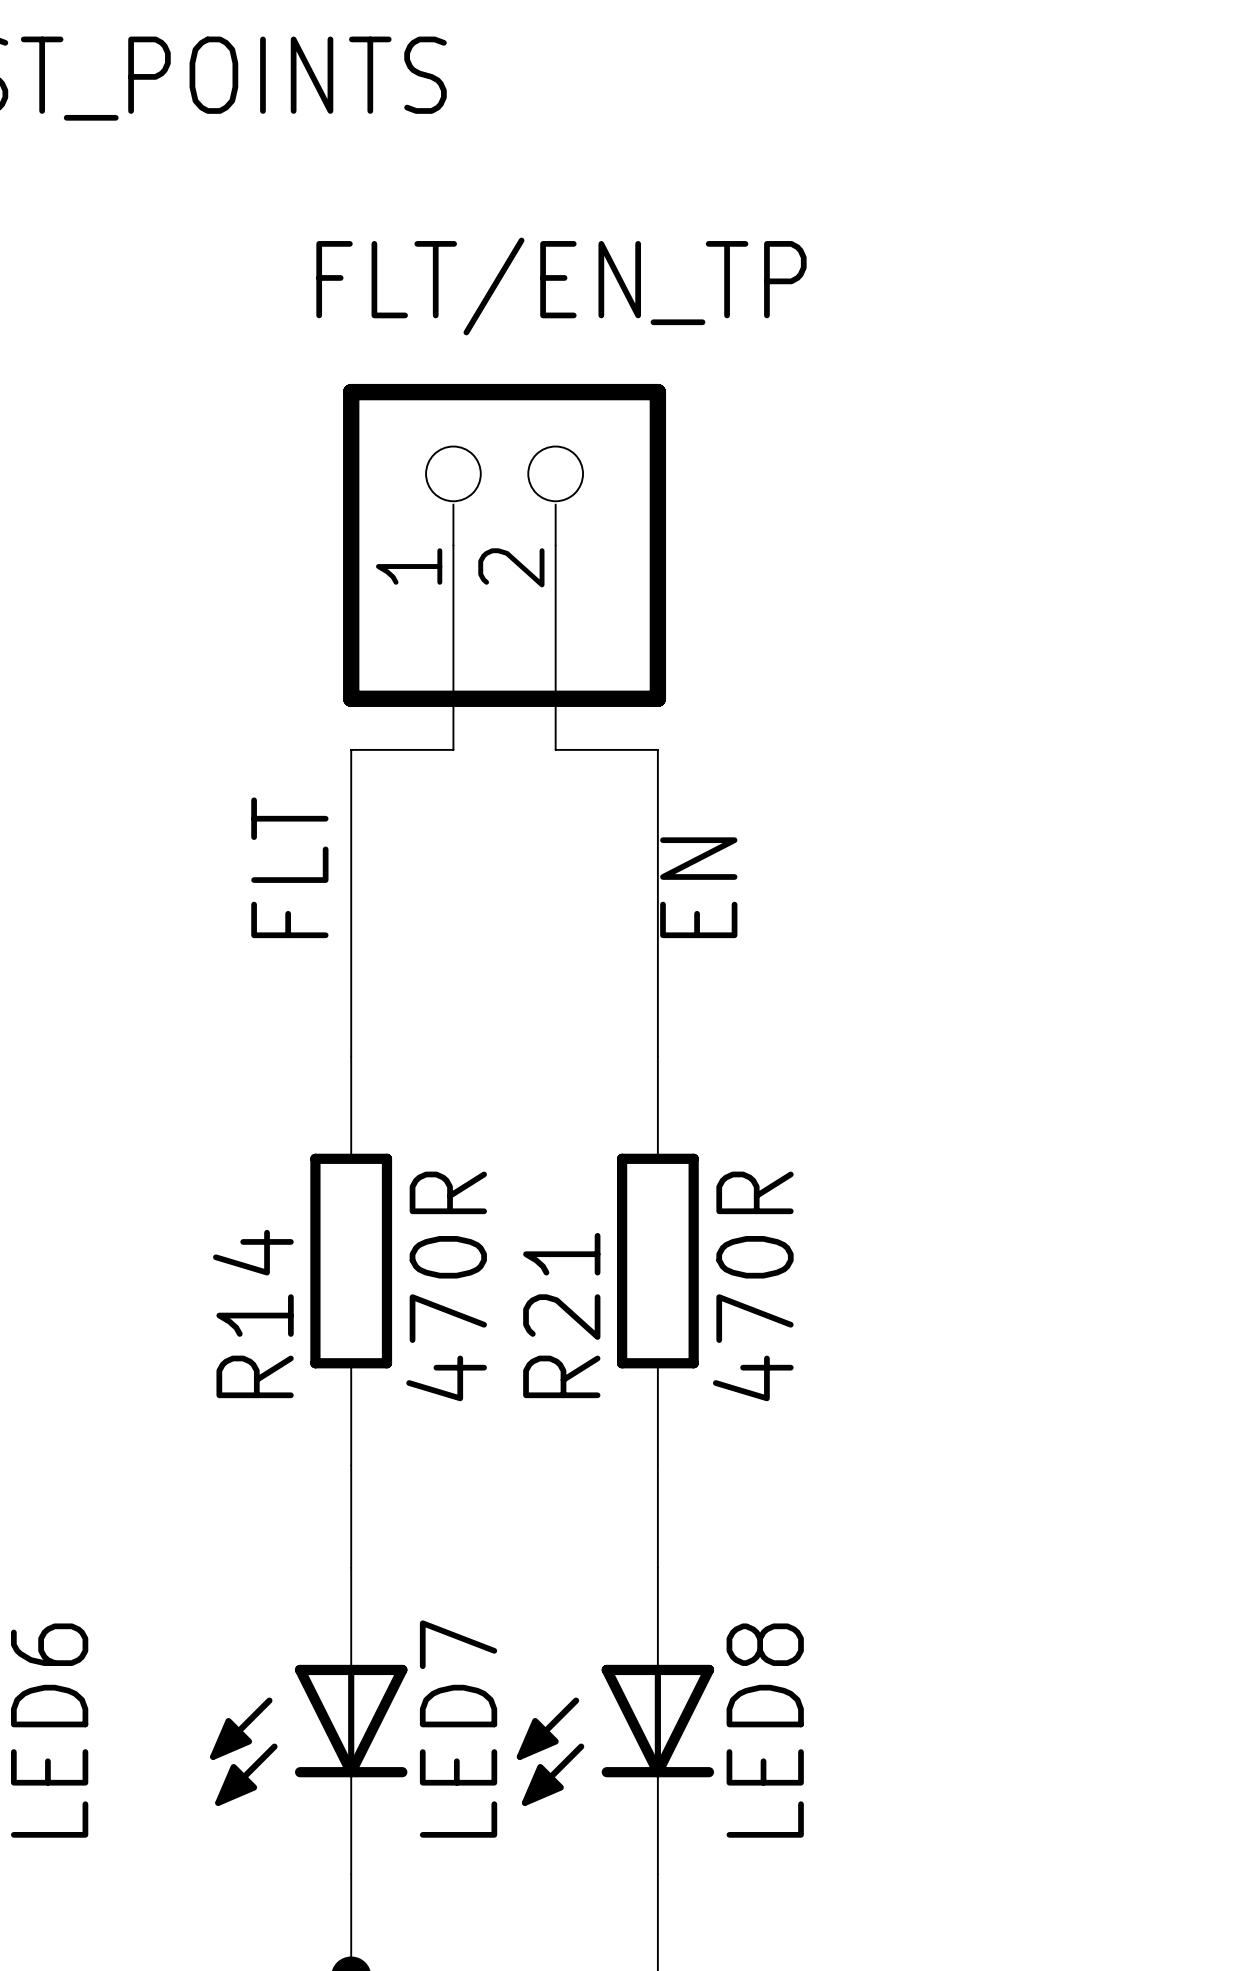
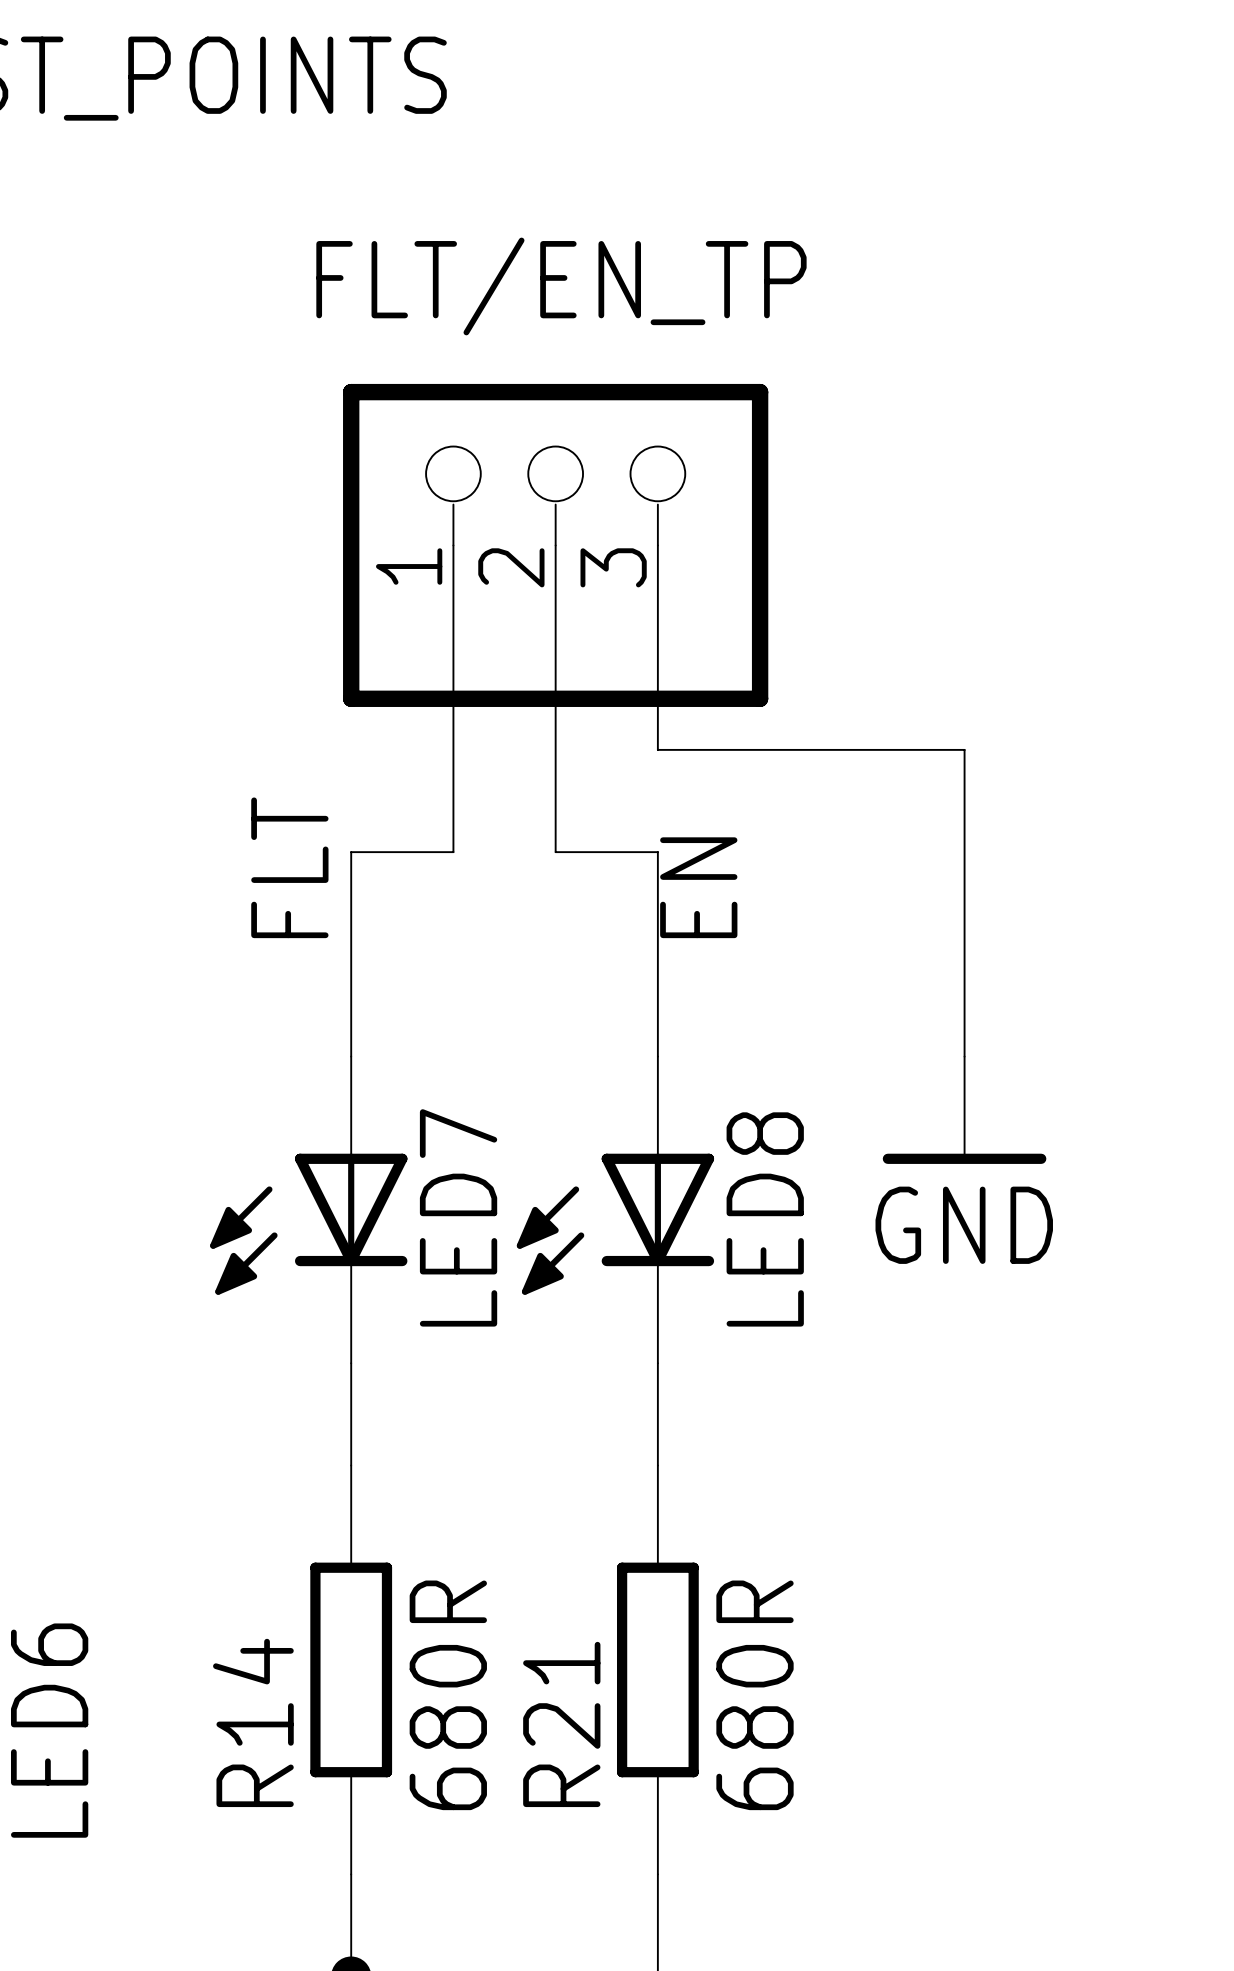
FLT/EN_TP: (504, 545) -> none
FLT/EN_TP: none -> (555, 545)
wire: none -> (657, 545) (657, 749) (964, 749) (964, 1056)
wire: (453, 749) (351, 749) (351, 852) -> (453, 749) (453, 852) (351, 852)
wire: (555, 749) (657, 749) (657, 852) -> (555, 749) (555, 852) (657, 852)
power symbol: none -> GND (964, 1110)
R14 position: (351, 1261) -> (351, 1669)
R21 position: (657, 1261) -> (657, 1669)
R14 value: 470R (446, 1286) -> 680R (448, 1695)
R21 value: 470R (753, 1286) -> 680R (755, 1695)
LED7 position: (308, 1721) -> (308, 1209)
LED8 position: (615, 1721) -> (615, 1209)

